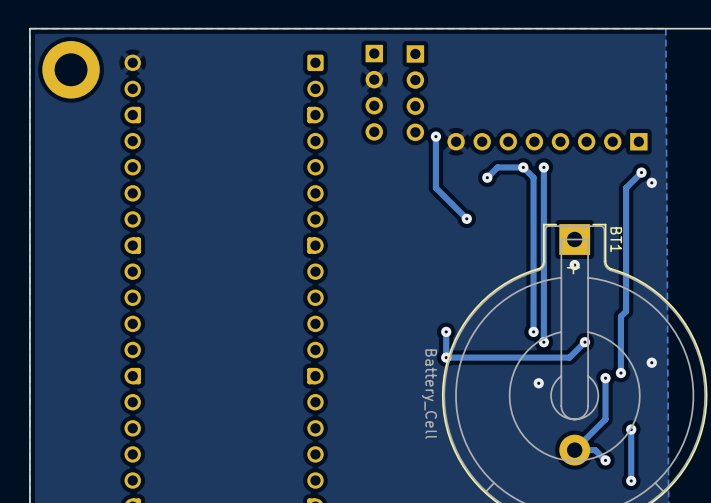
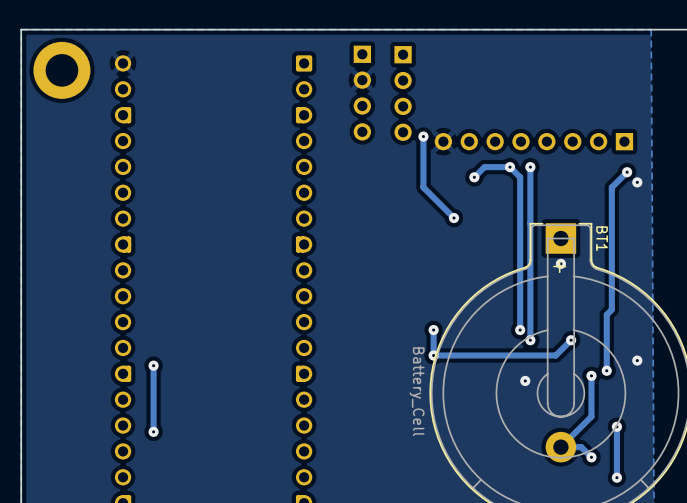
track: none -> (153, 365) (153, 431)
via: none -> (153, 365)
via: none -> (153, 431)

